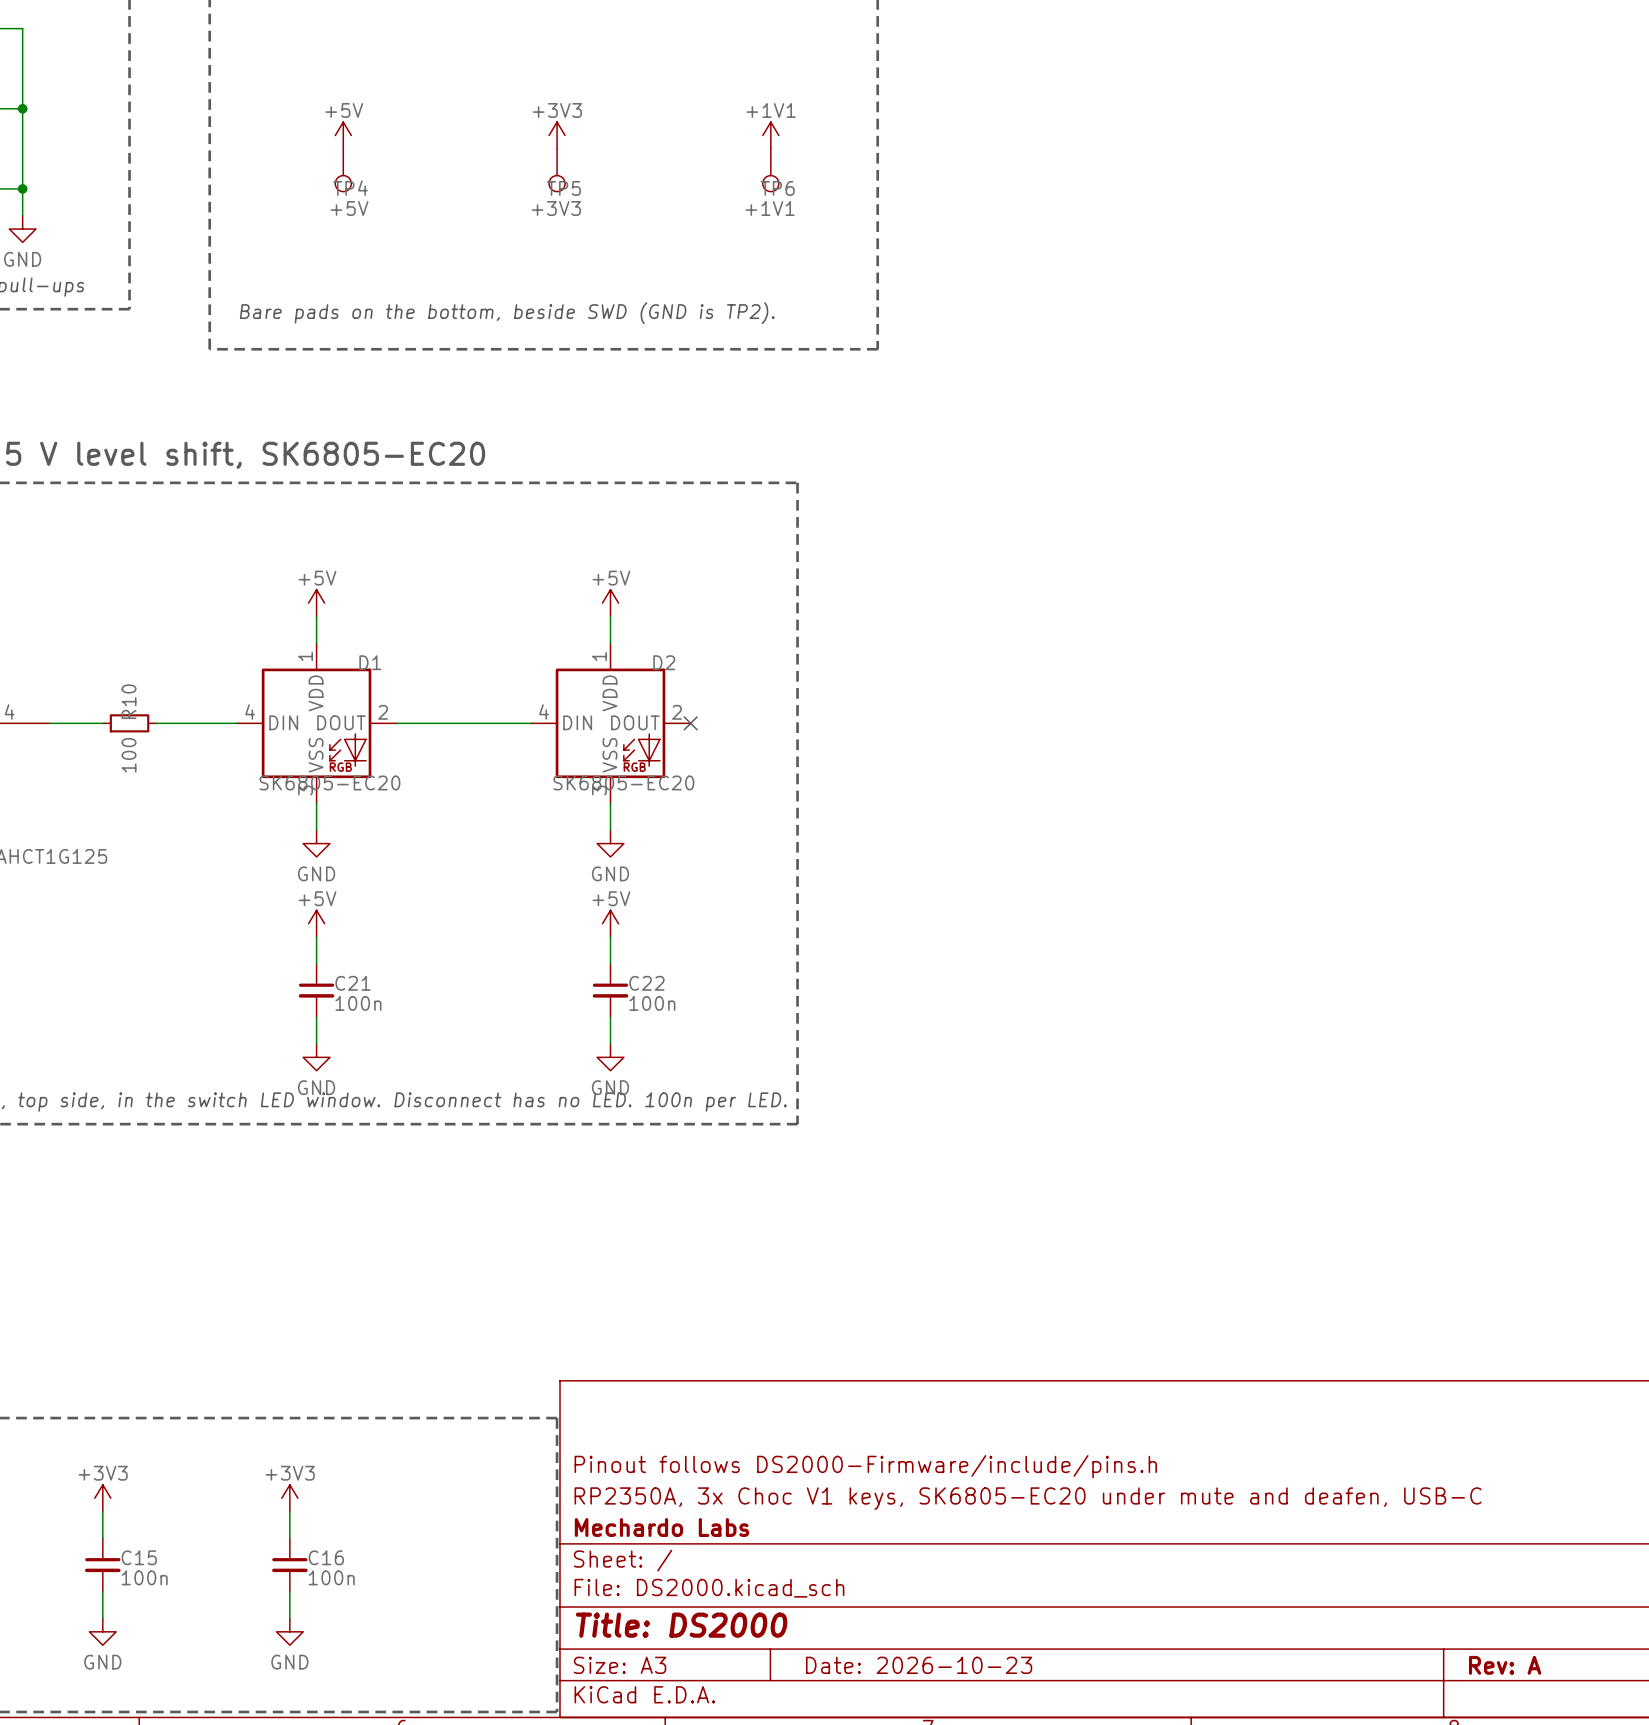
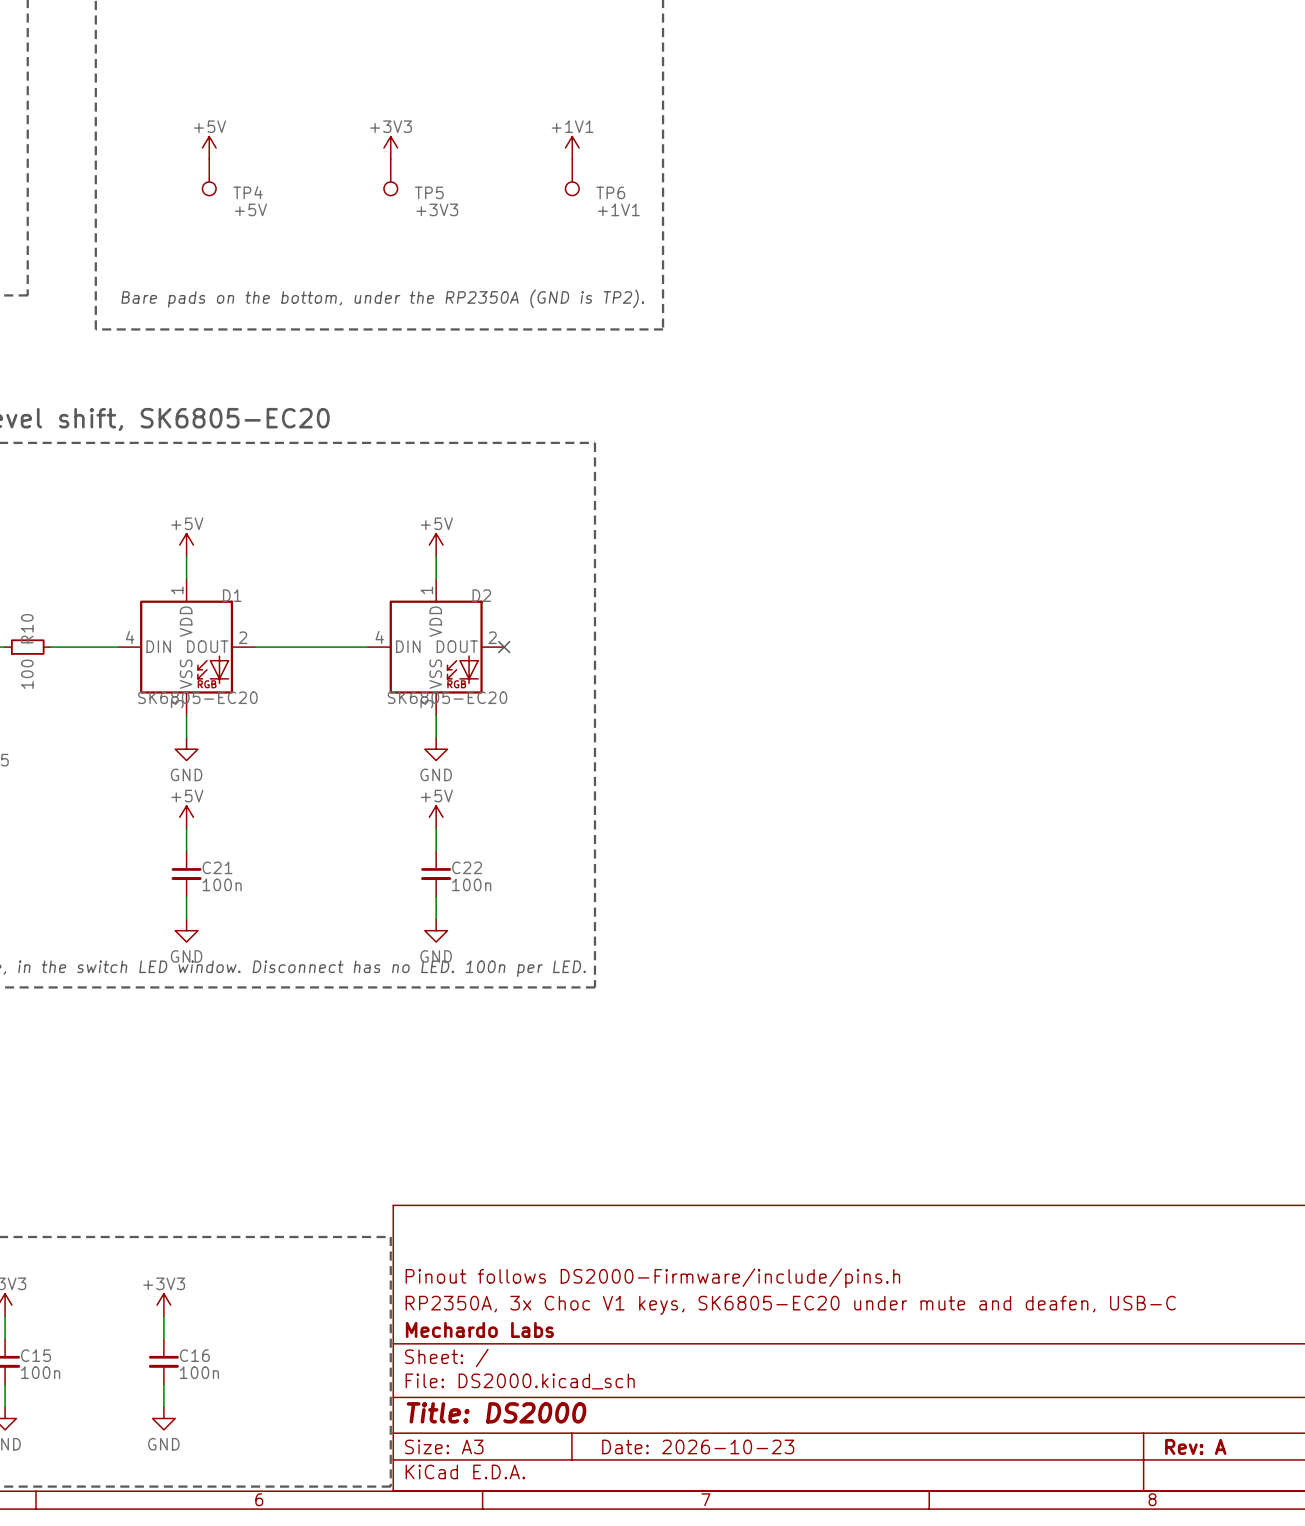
TP4 name position: TP4 (350, 188) -> TP4 (247, 192)
TP5 name position: TP5 (563, 188) -> TP5 (429, 192)
TP6 name position: TP6 (777, 188) -> TP6 (610, 192)
TP4 value position: +5V (349, 208) -> +5V (250, 209)
TP5 value position: +3V3 (556, 208) -> +3V3 (437, 209)
TP6 value position: +1V1 (770, 208) -> +1V1 (618, 209)
text: Bare pads on the bottom, beside SWD (GND is TP2). (507, 313) -> Bare pads on the bottom, under the RP2350A (GND is TP2). (382, 298)

